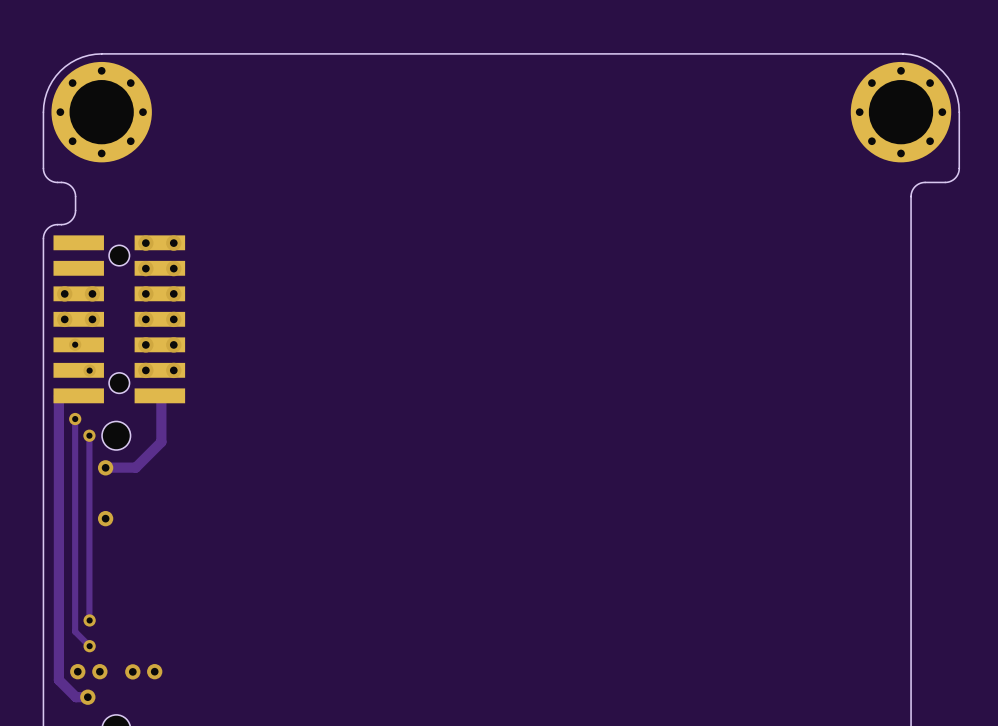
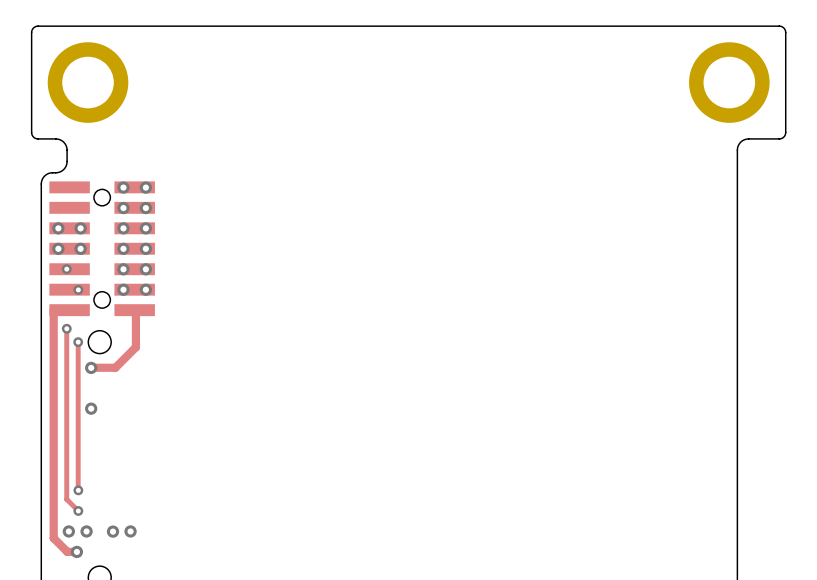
part footprint: [51, 61, 152, 163] -> [47, 42, 129, 123]
part footprint: [850, 61, 952, 163] -> [689, 42, 770, 123]
board edge: (57, 182) (47, 178) (43, 169) (43, 112) (46, 92) (56, 75) (70, 62) (82, 57) (101, 53) (910, 54) (931, 62) (942, 71) (951, 83) (957, 97) (959, 112) (959, 169) (955, 178) (945, 182) -> (52, 138) (36, 138) (31, 133) (31, 32) (33, 28) (37, 26) (780, 26) (784, 28) (785, 32) (785, 133) (780, 138) (764, 138)

